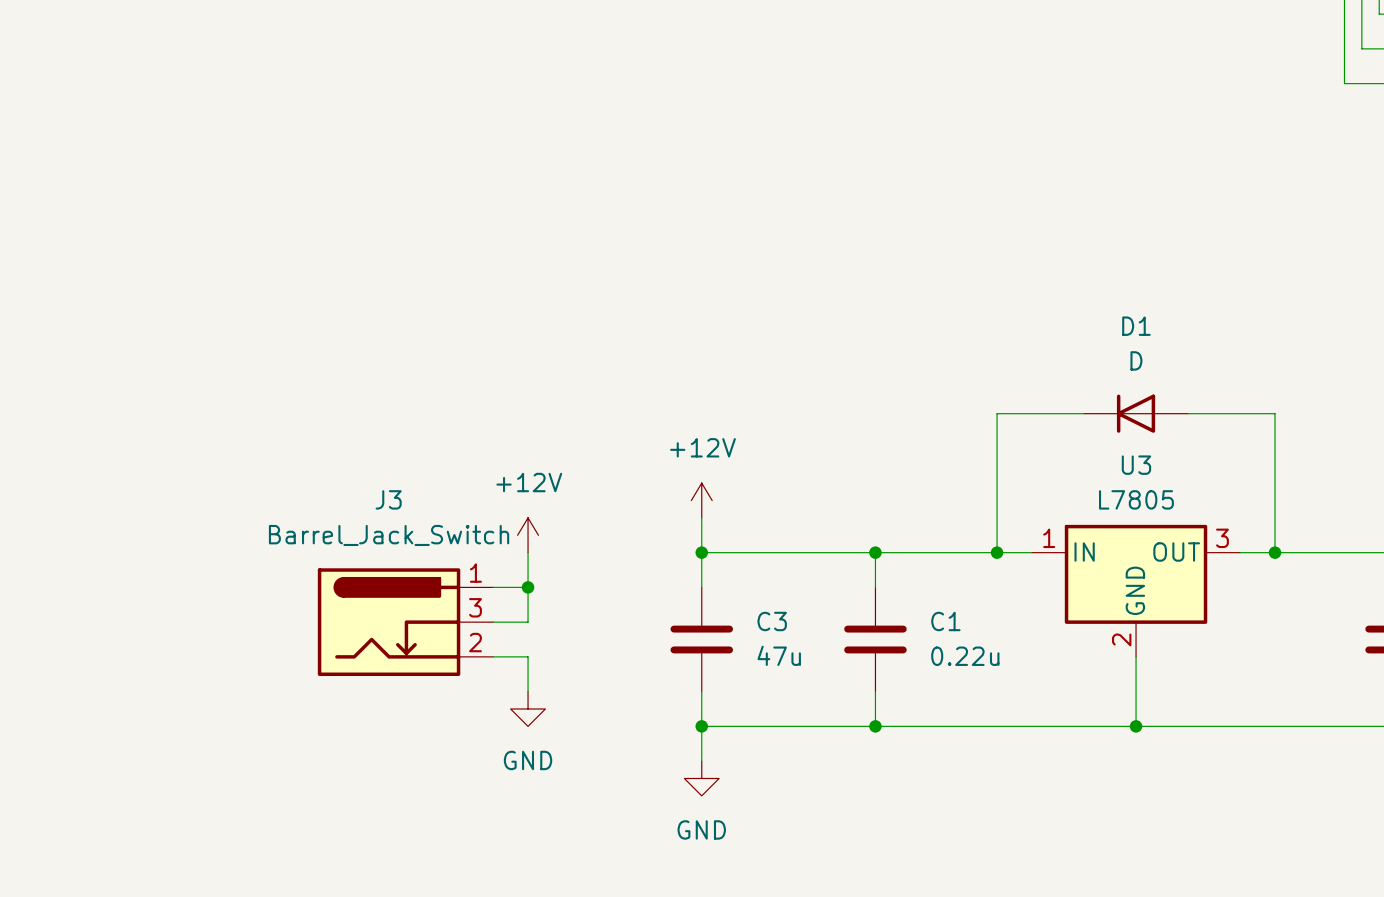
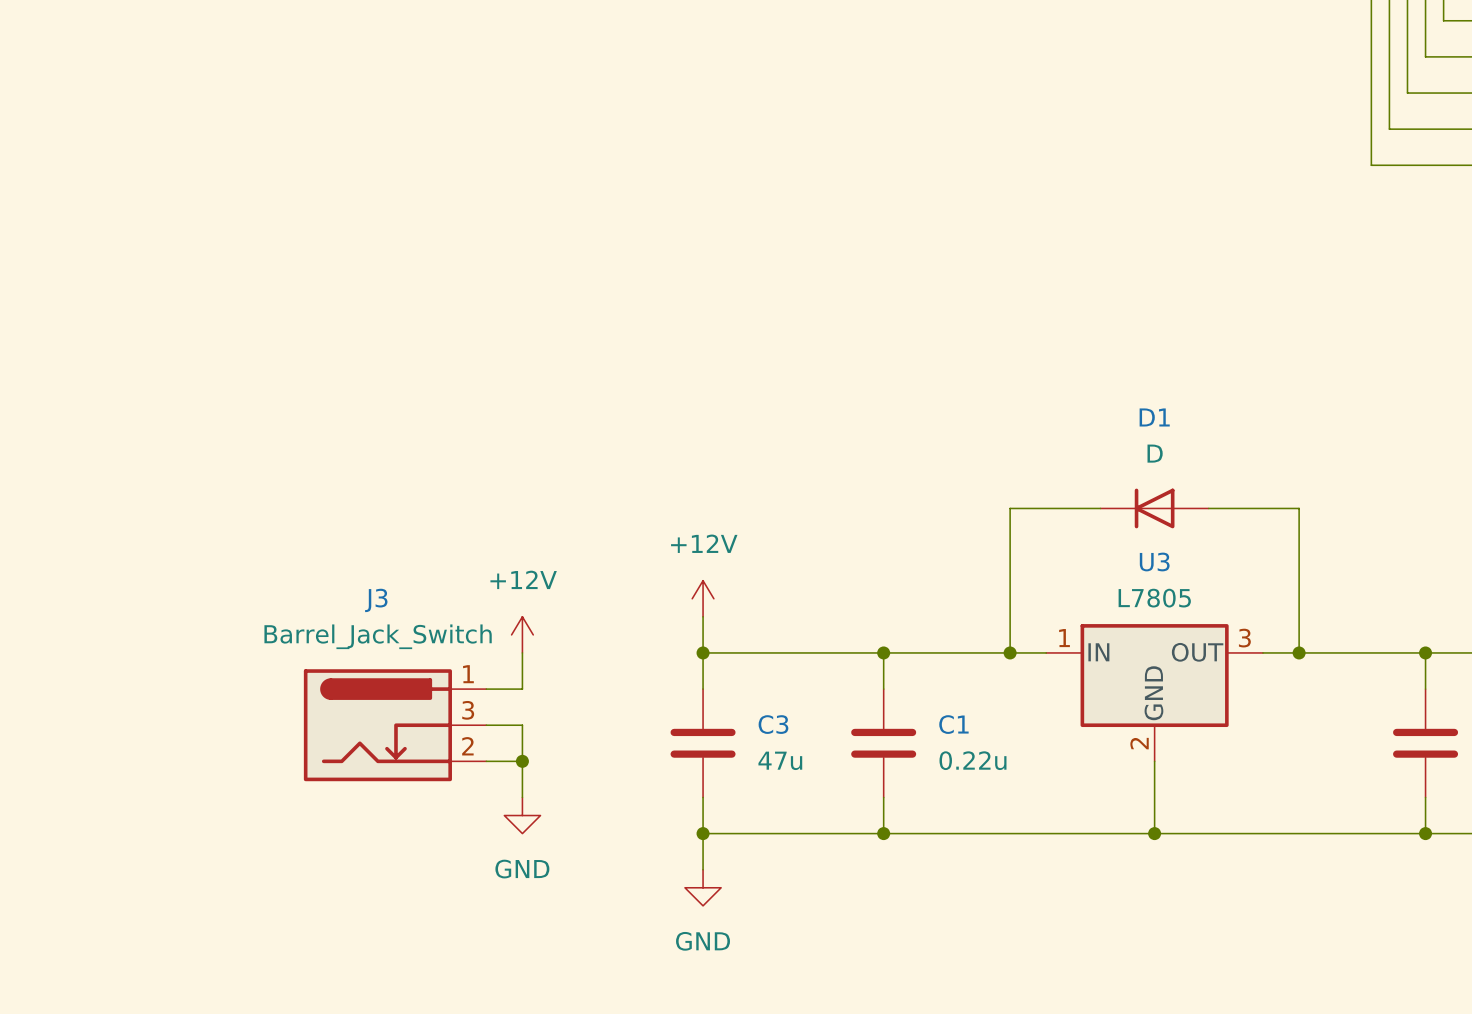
wire: (528, 587) (528, 622) -> (522, 761) (522, 725)
junction position: (528, 587) -> (522, 761)

